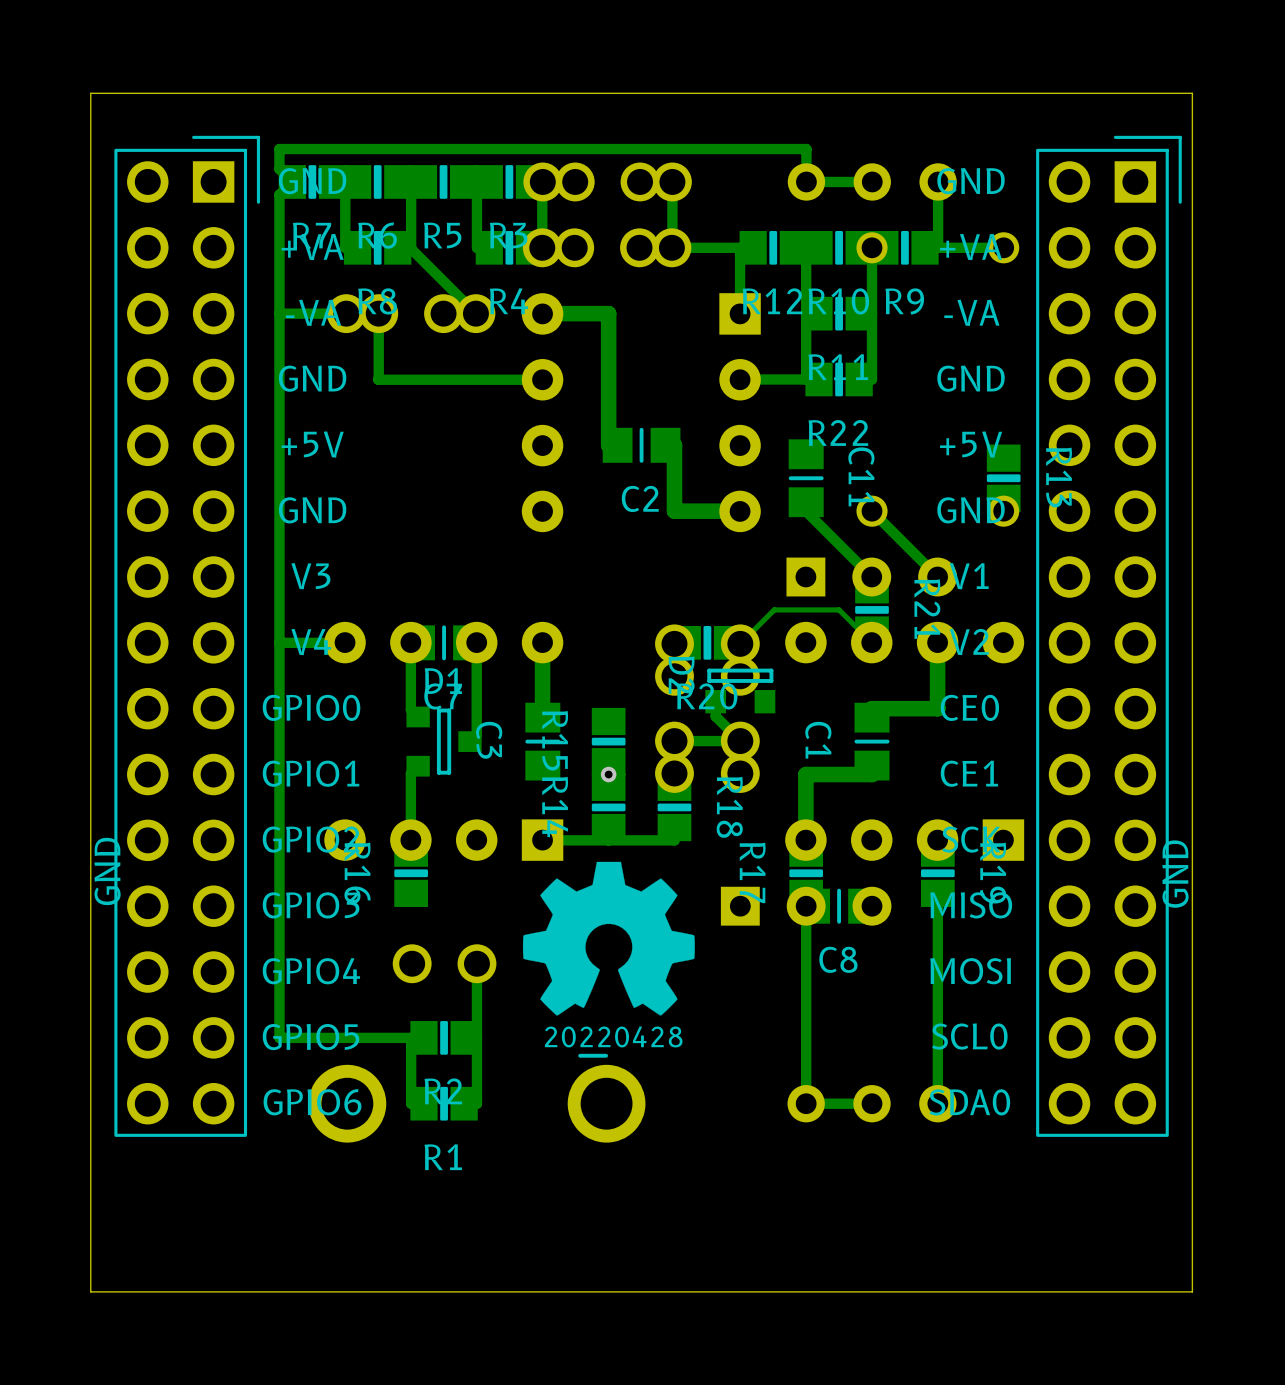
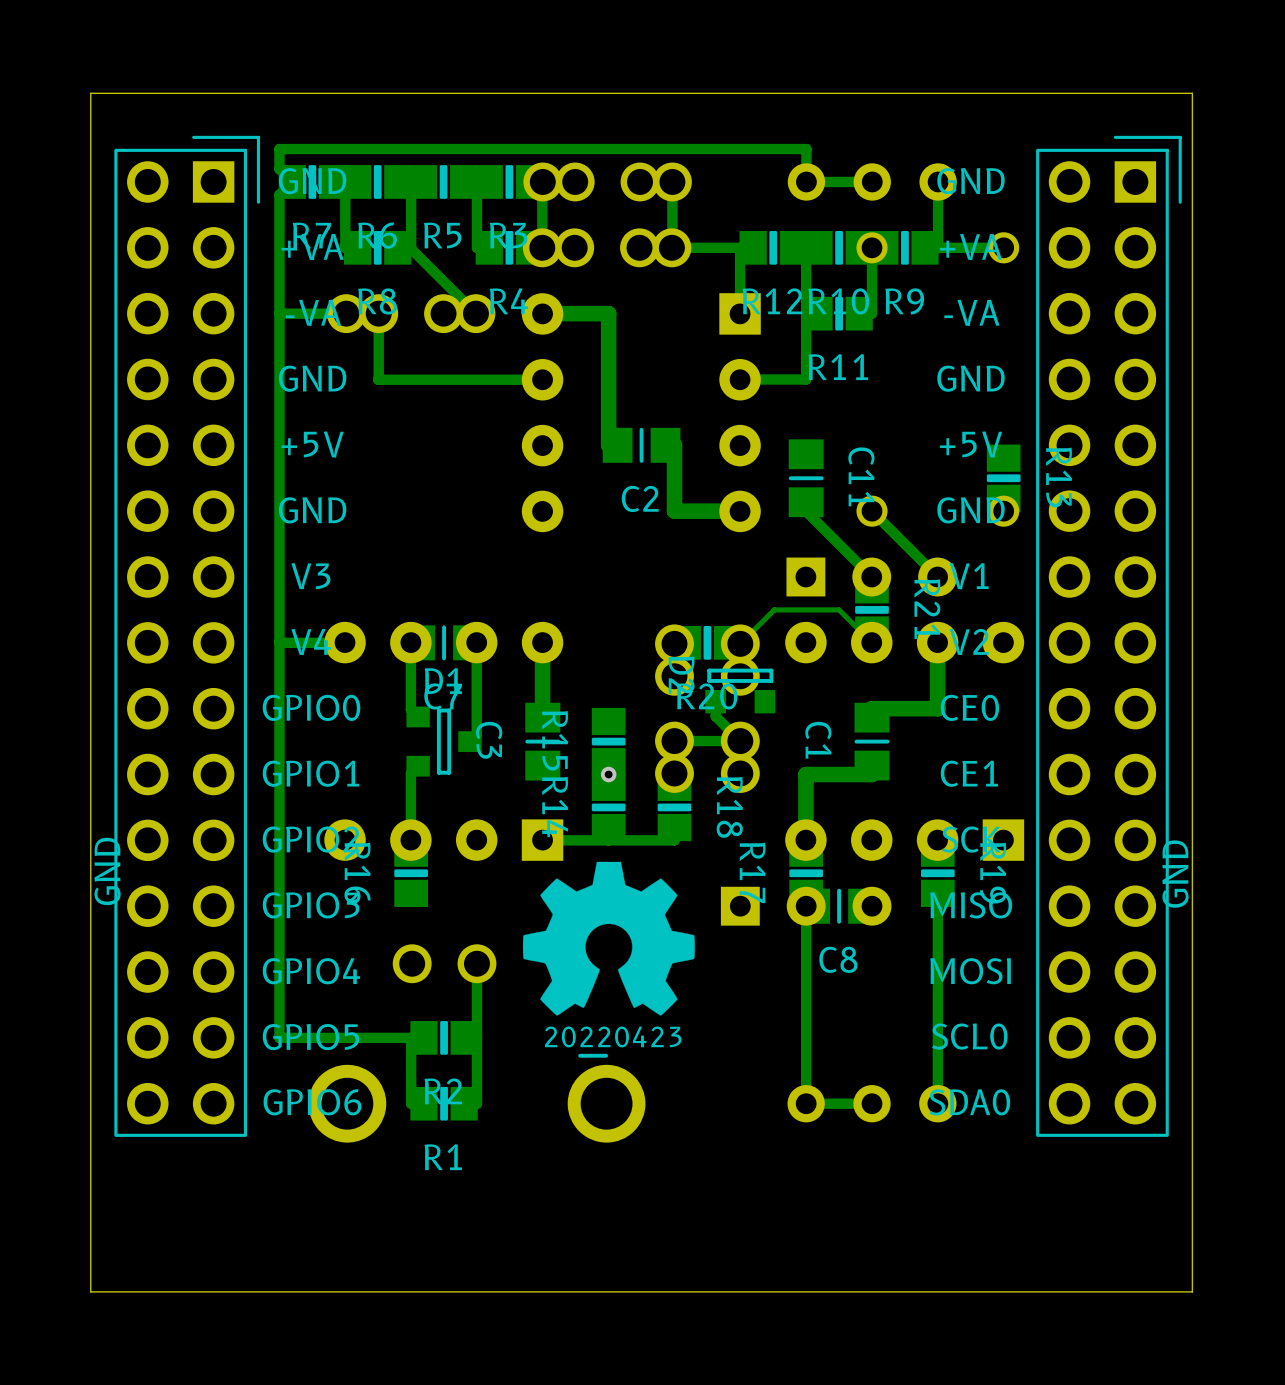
track: (872, 313) (872, 379) (859, 379) -> none
R22: (839, 379) -> none
drawing shape: [544, 1026, 683, 1058] -> [544, 1026, 682, 1058]

